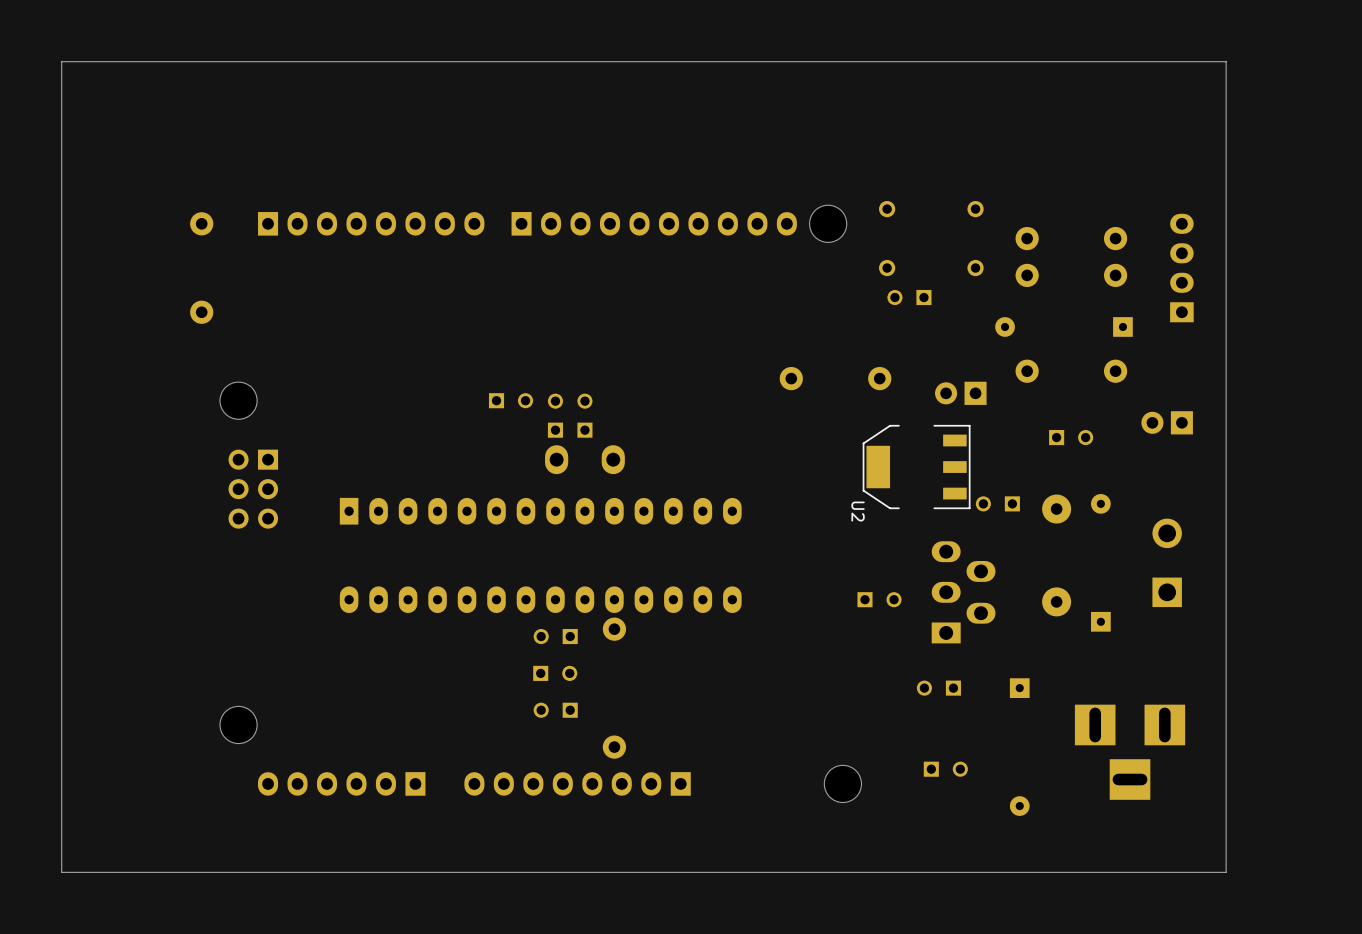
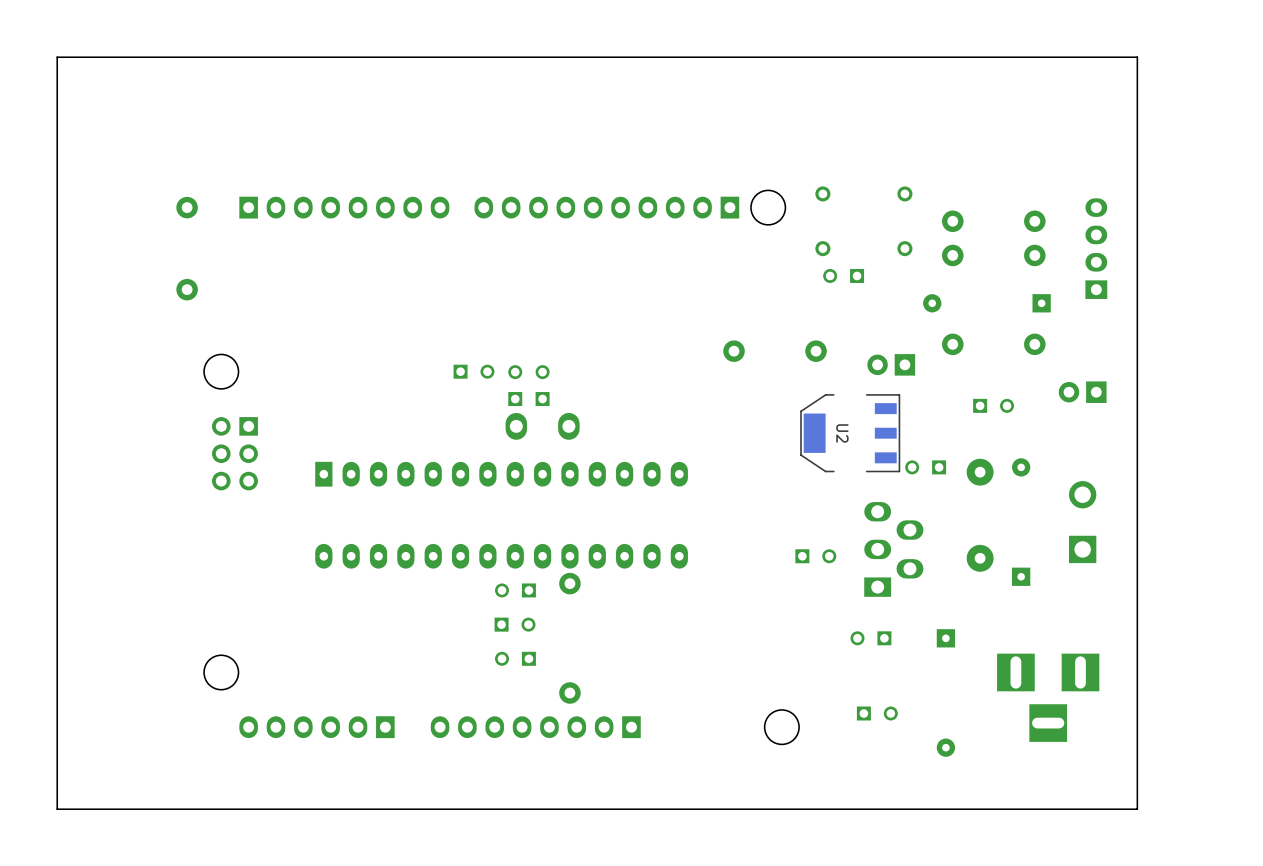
part rotation: 0° (654, 223) -> 180° (606, 207)
U2 name position: U2 (858, 511) -> U2 (842, 433)

